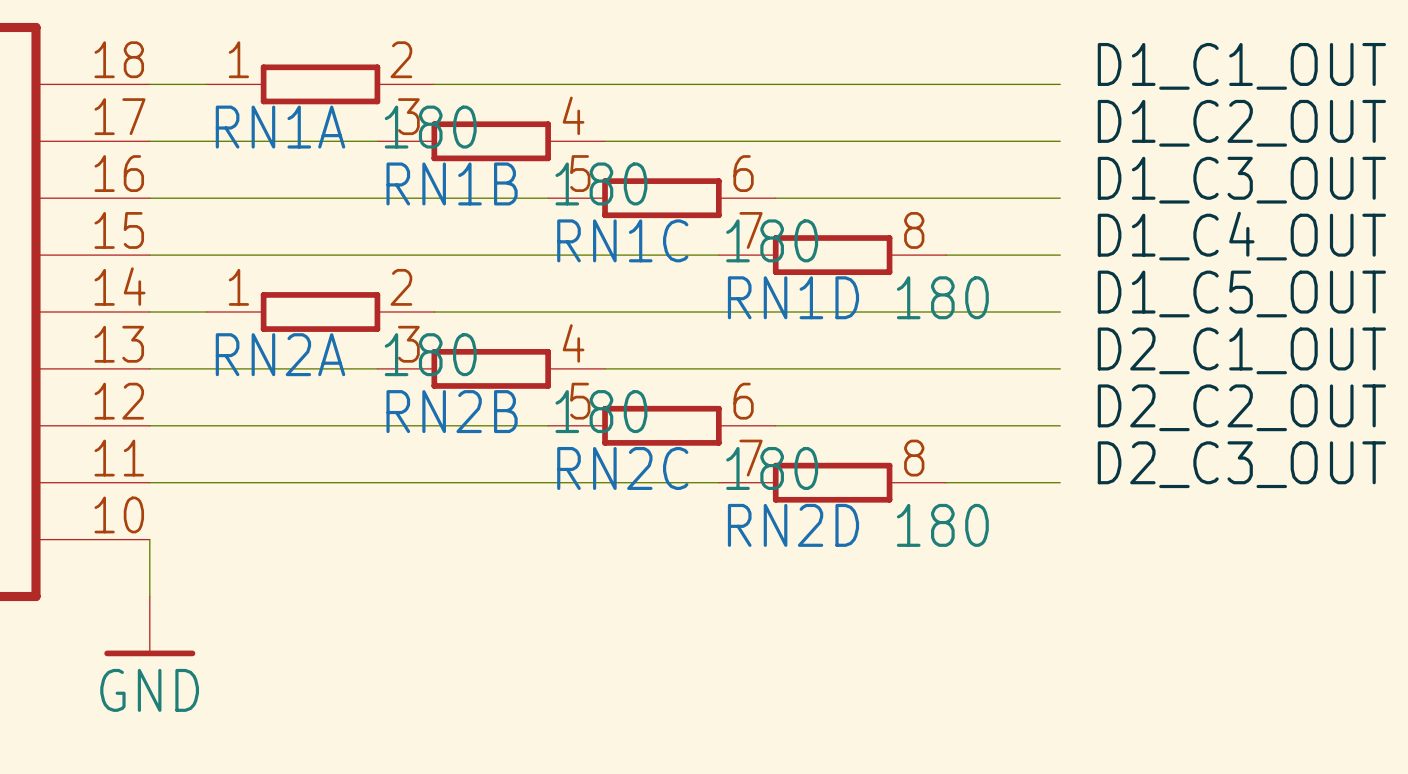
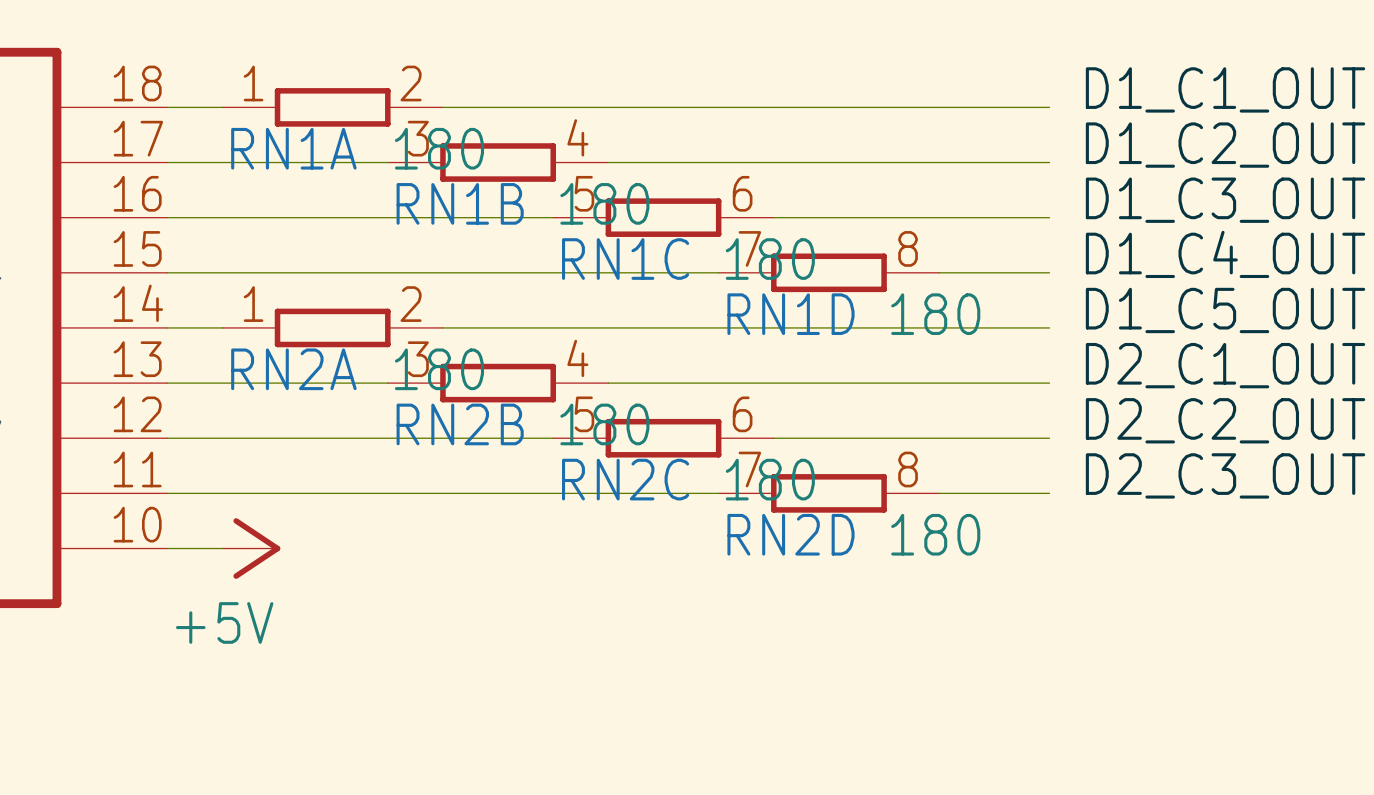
wire: (149, 539) (149, 596) -> (167, 548) (222, 548)
power symbol: none -> +5V (251, 548)
power symbol: GND (149, 626) -> none

